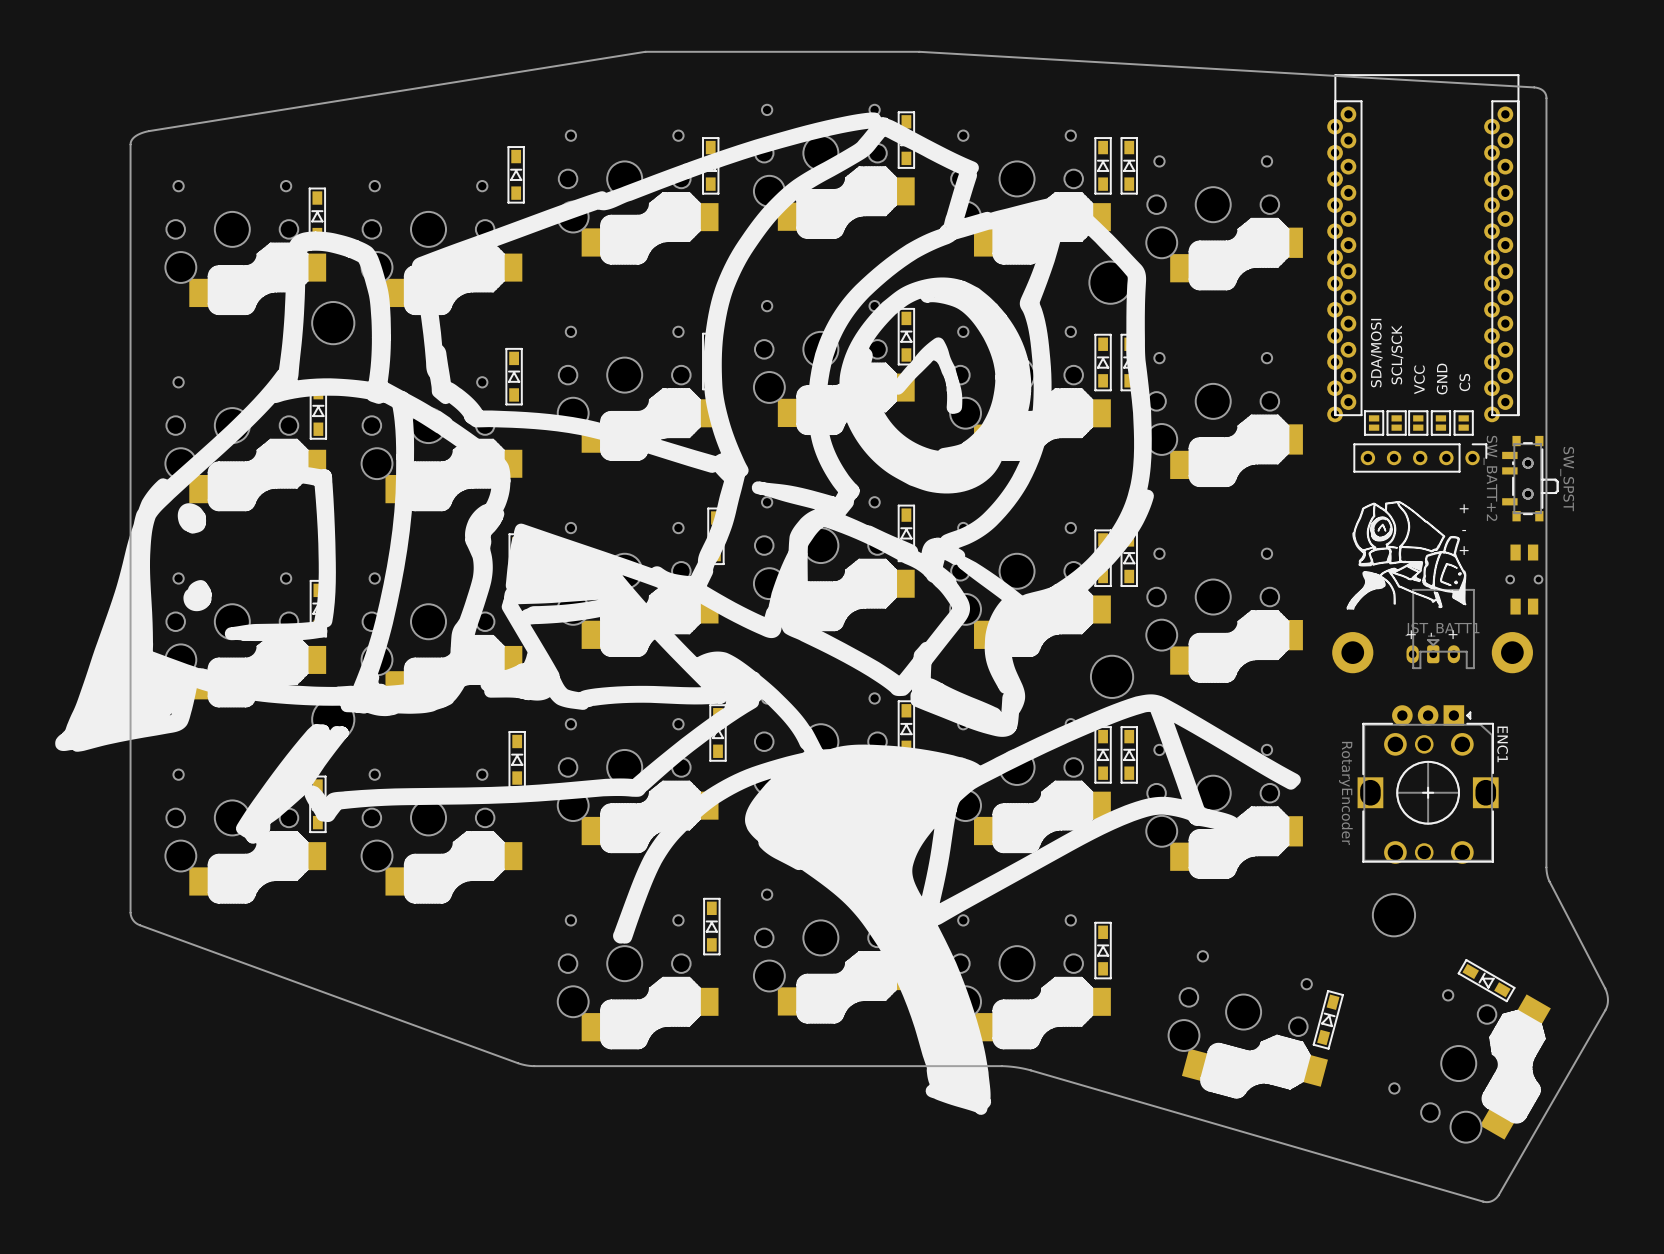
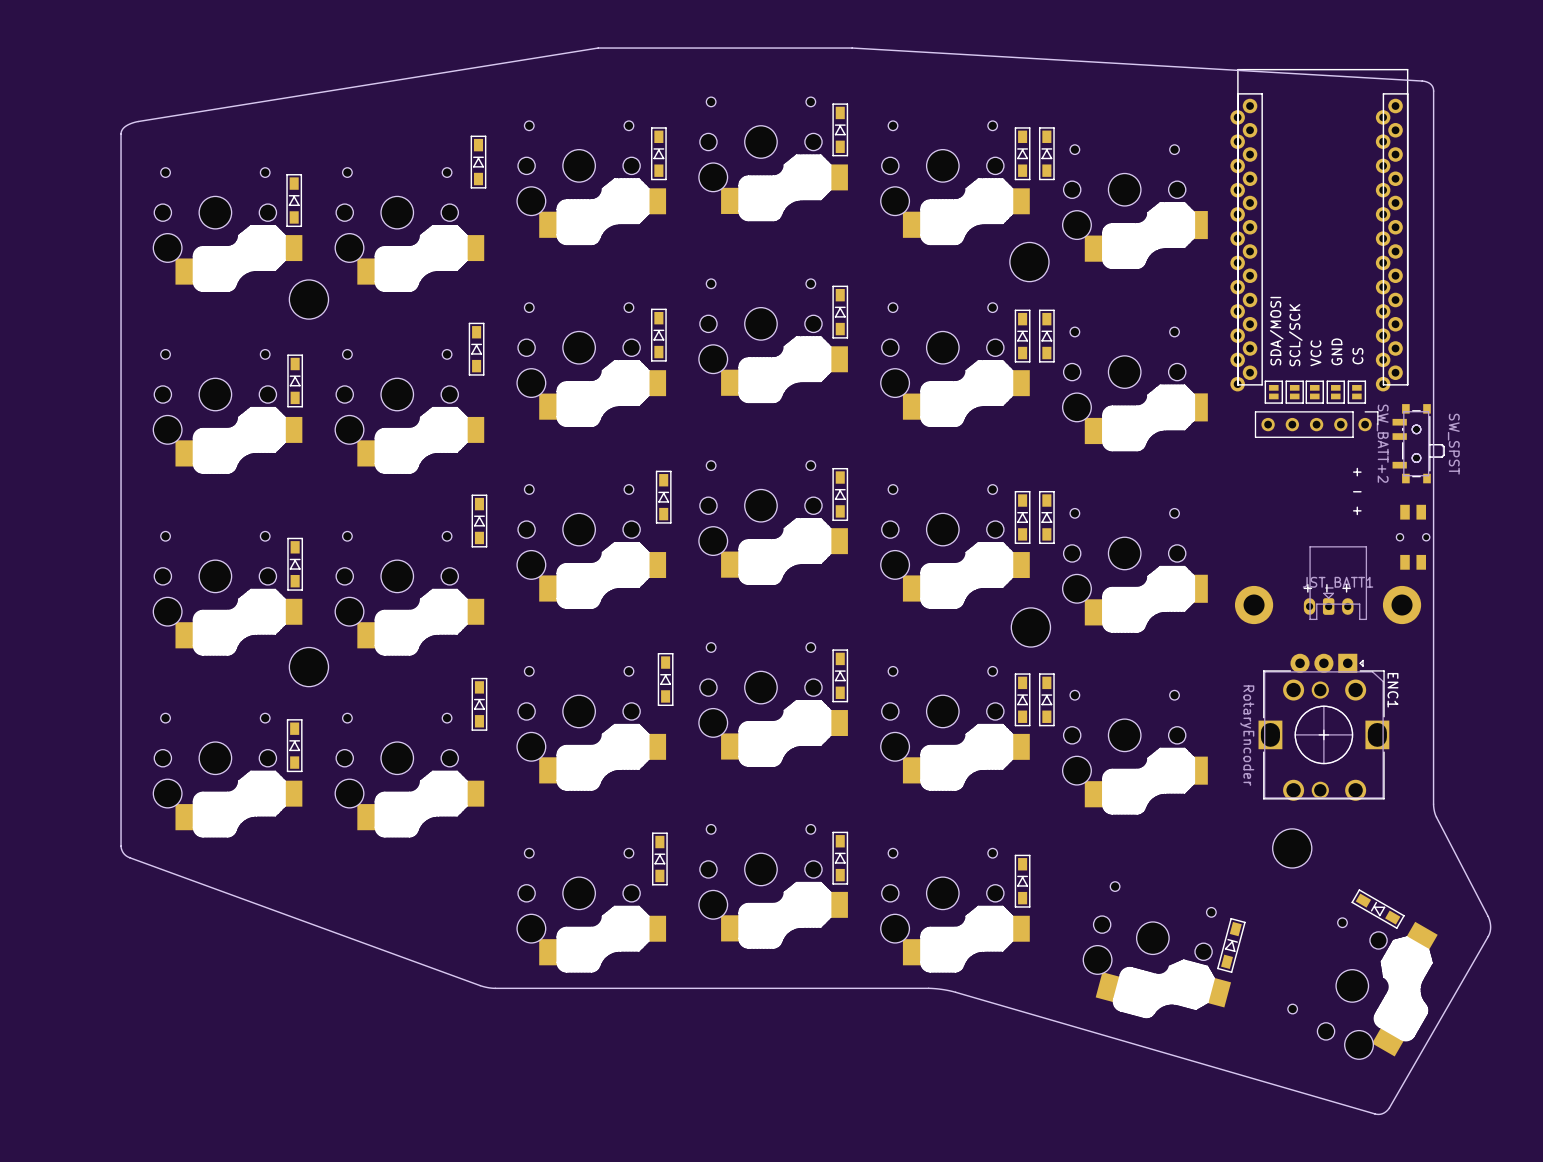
drawing: [55, 112, 1301, 1115] -> none
drawing: [1346, 500, 1467, 610] -> none

